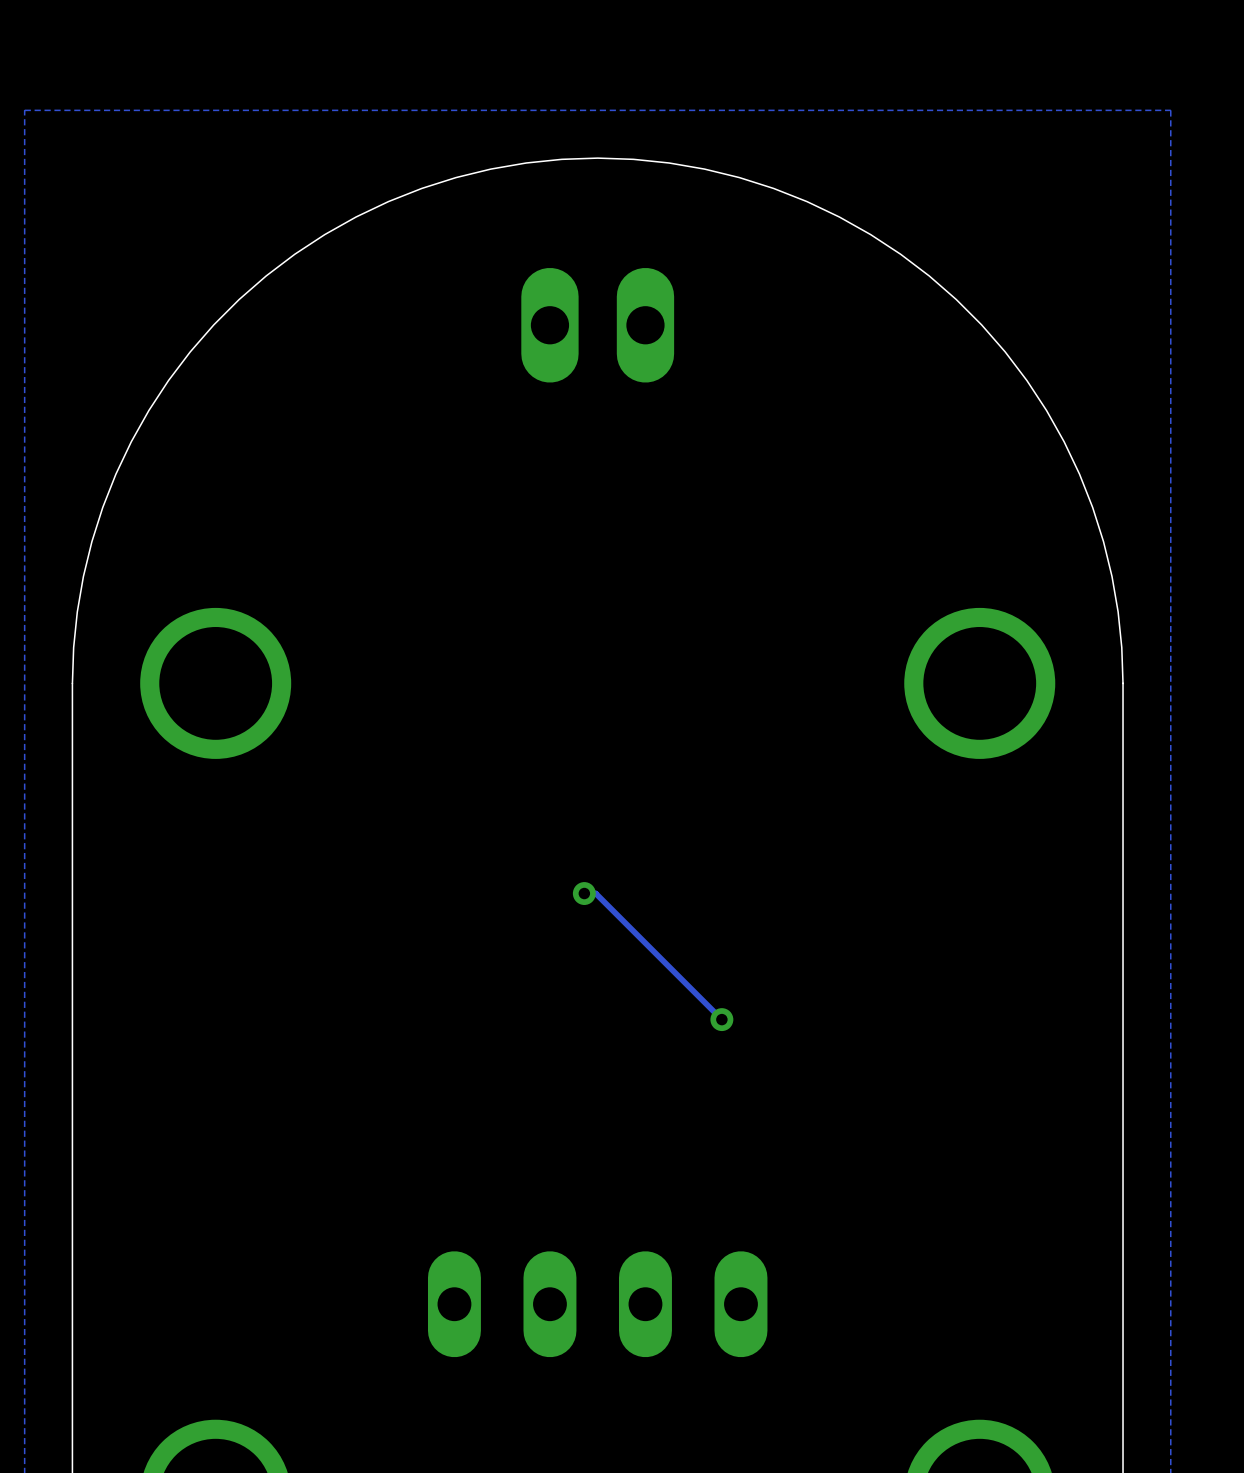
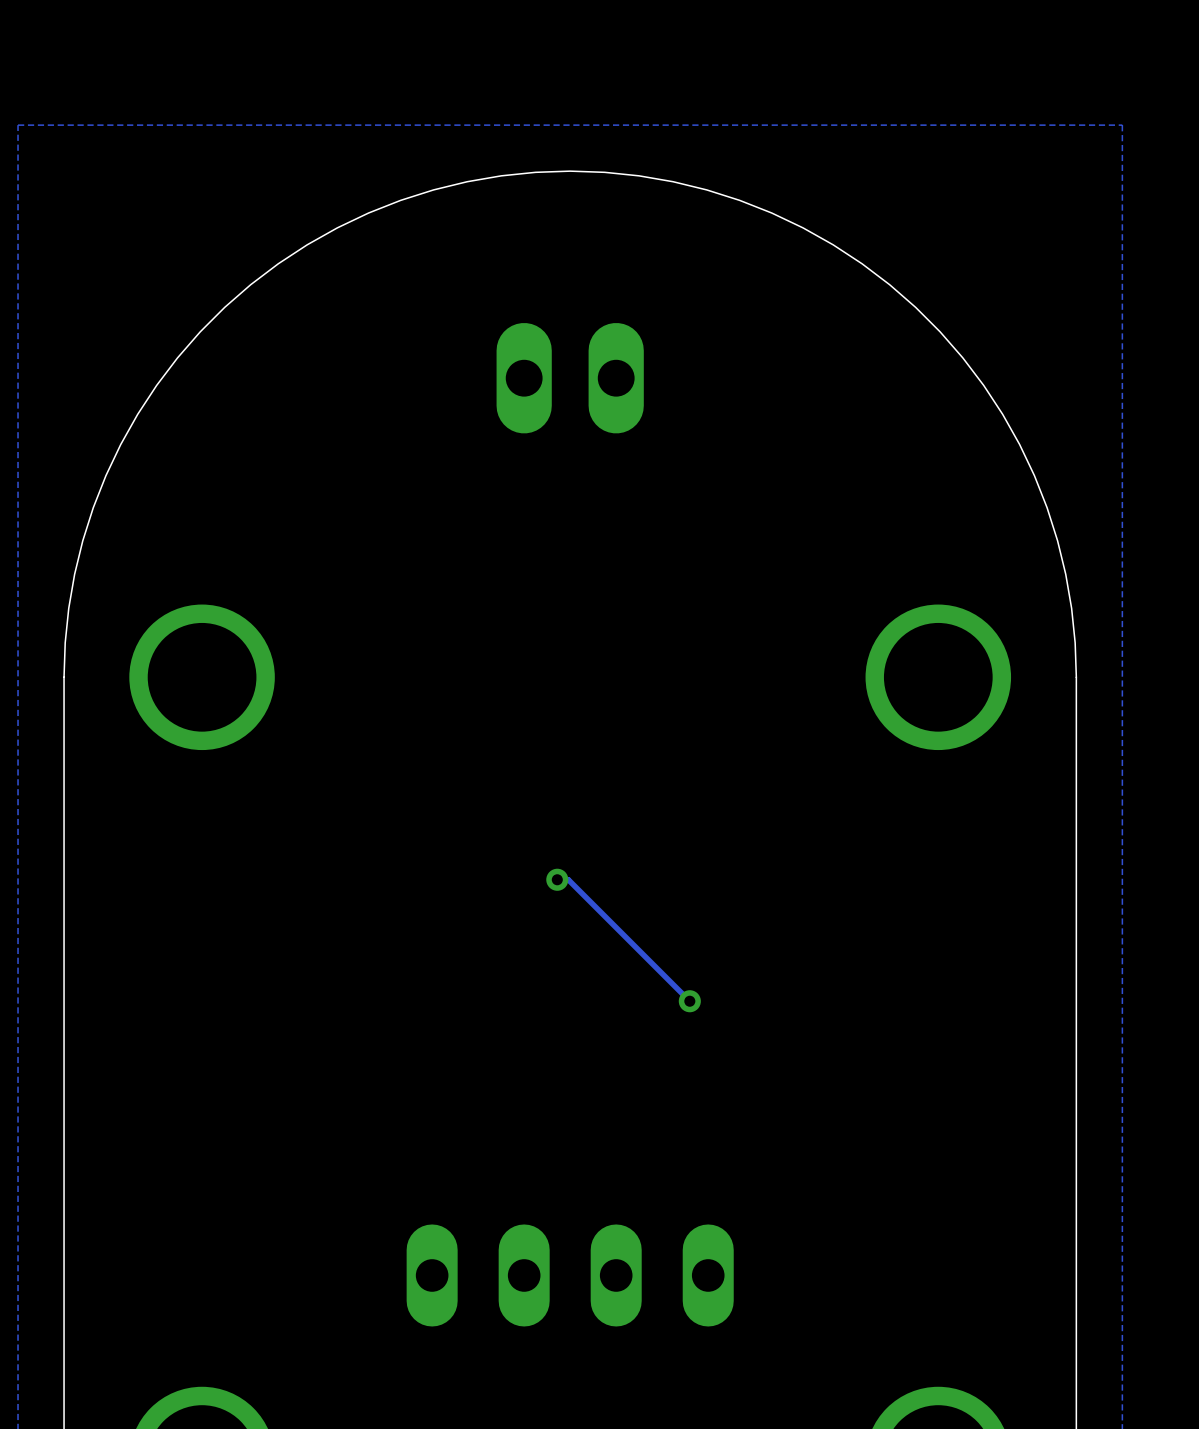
part position: (597, 325) -> (570, 378)

